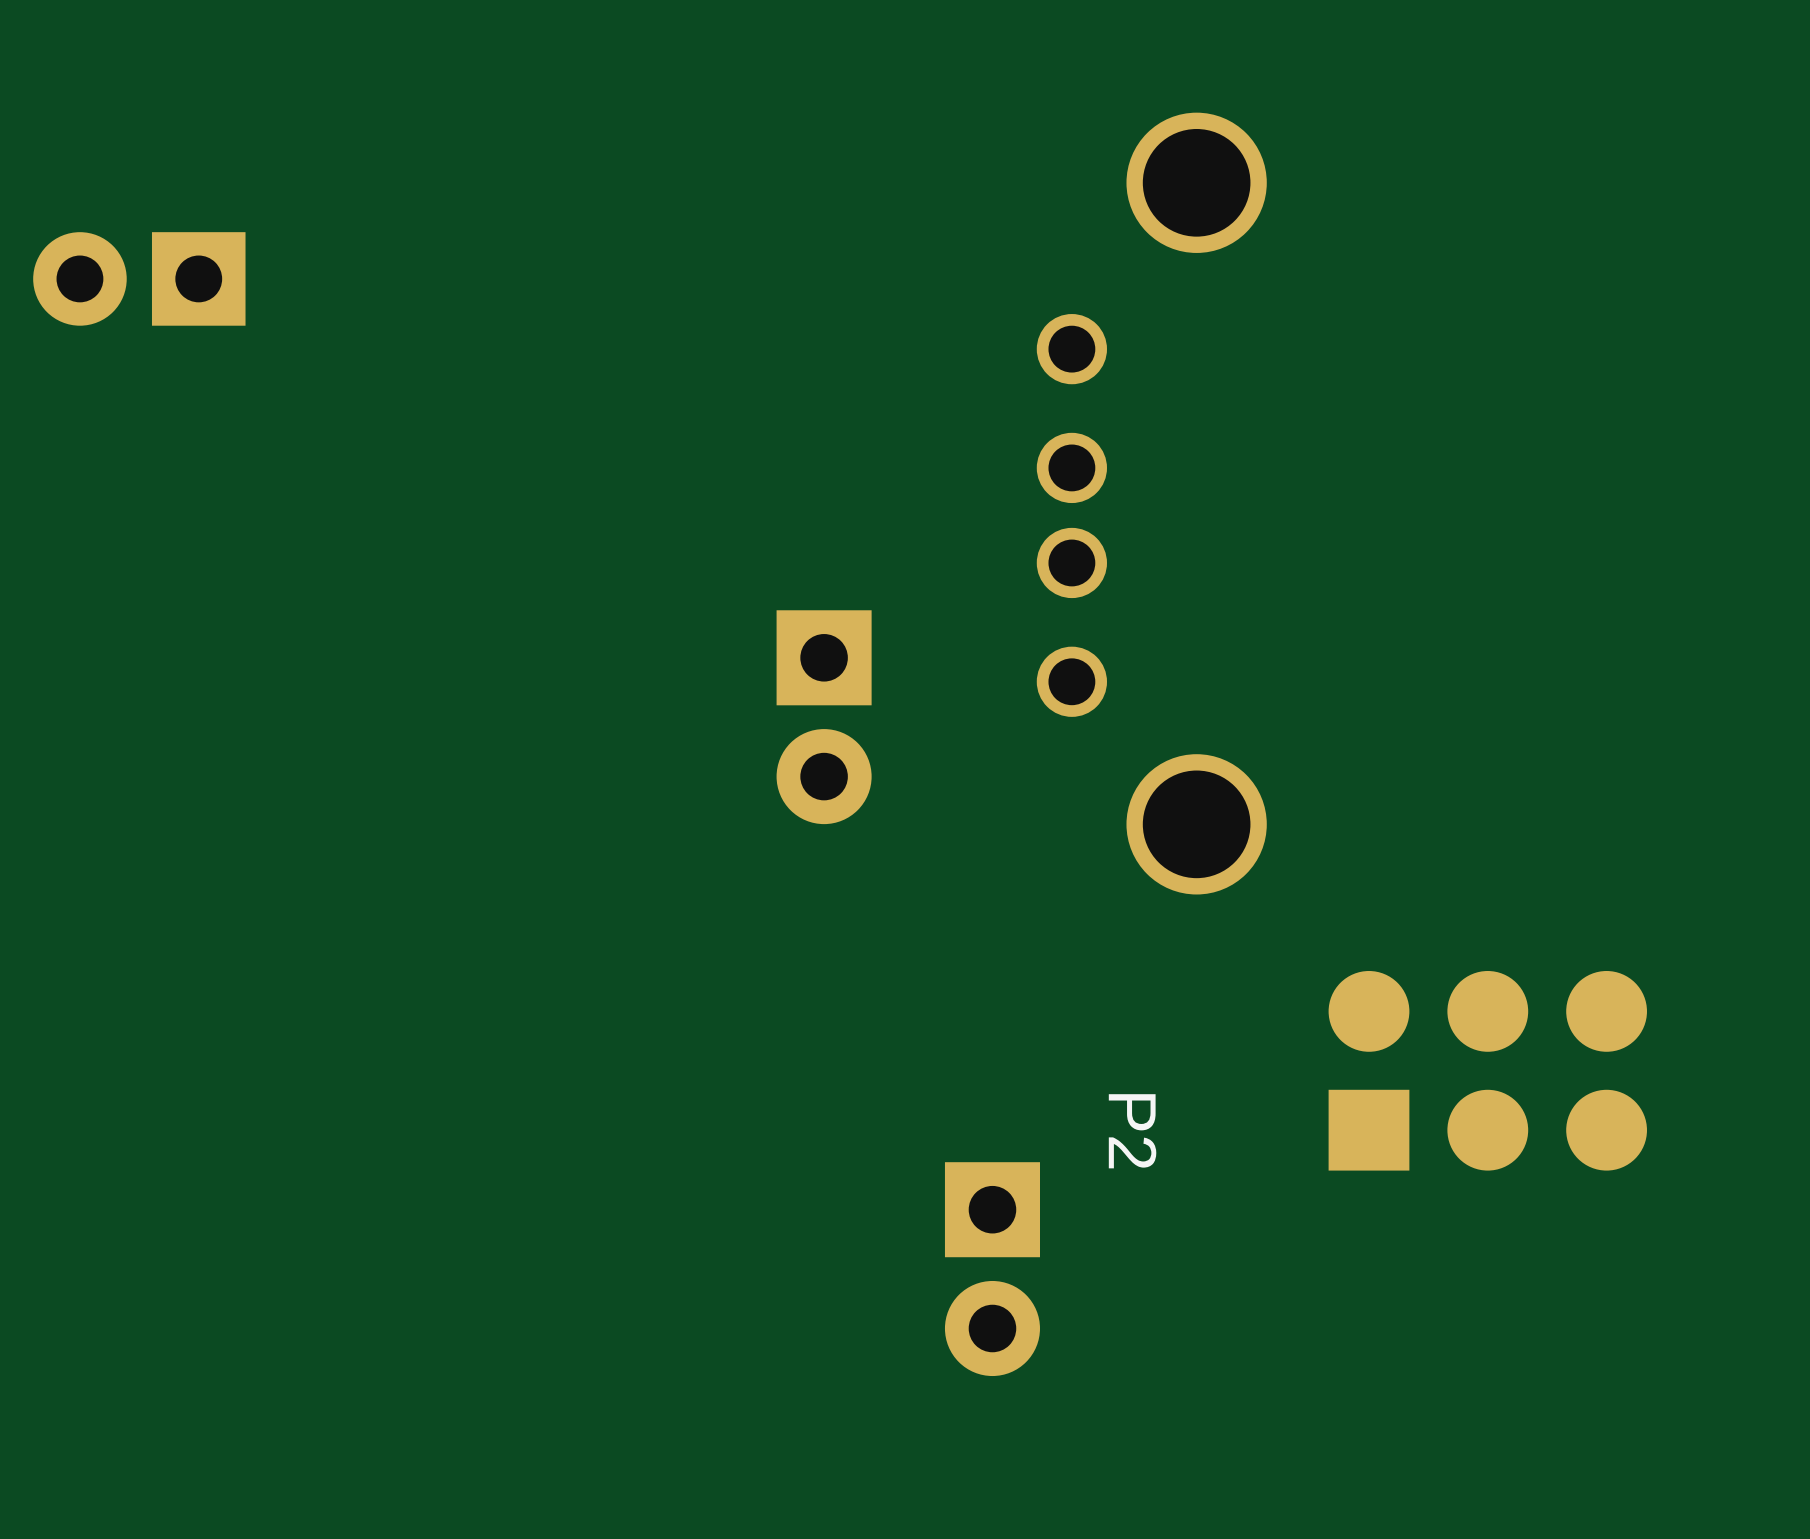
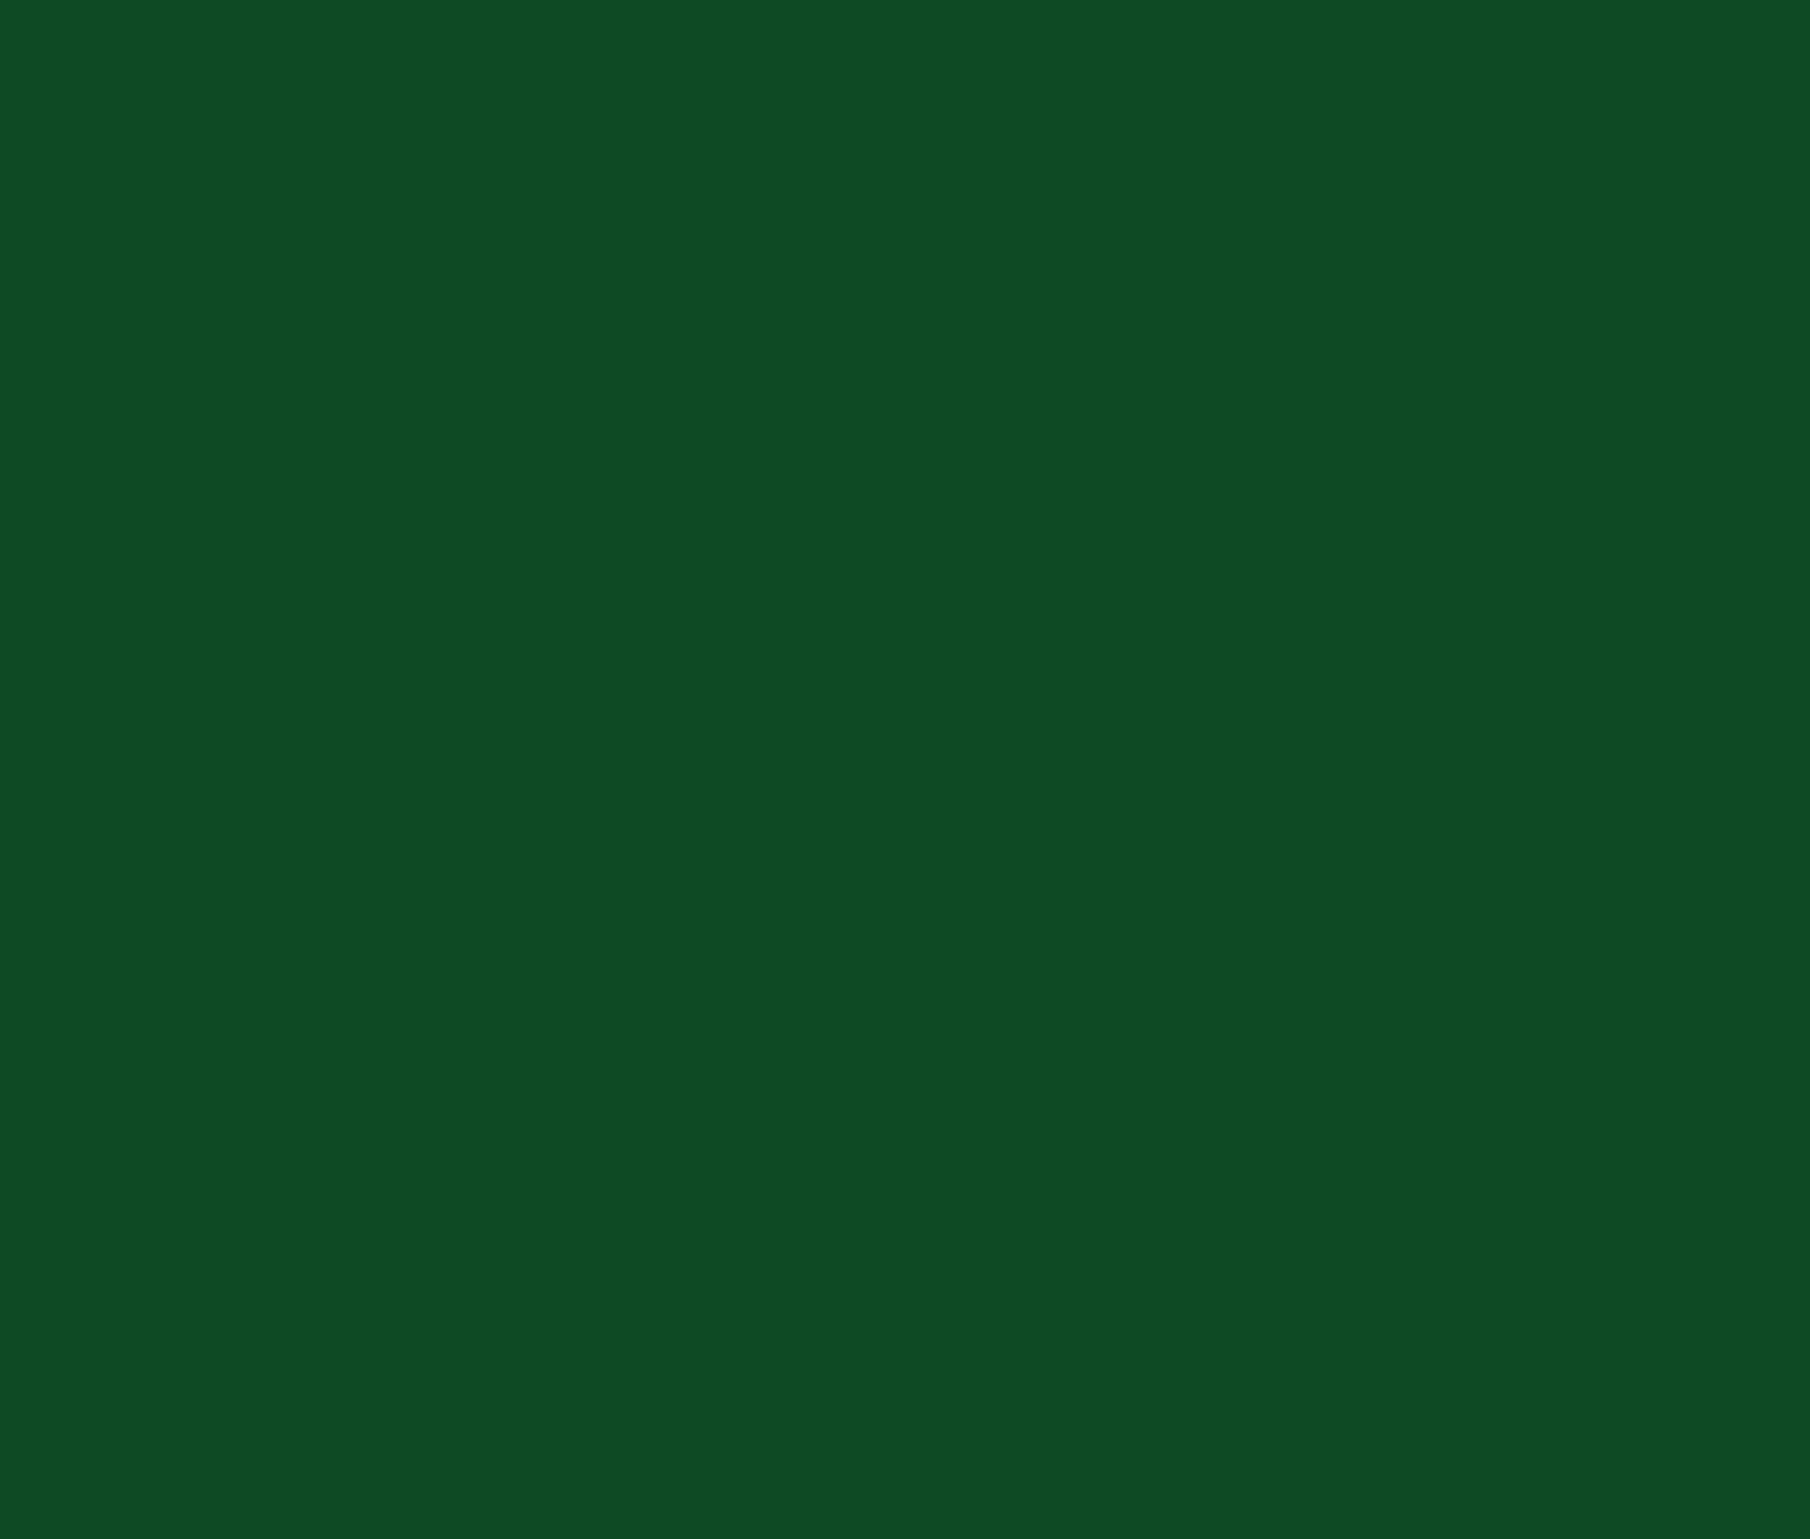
part: (139, 278) -> none
part: (1151, 503) -> none
part: (824, 717) -> none
P2: (1487, 1070) -> none
part: (992, 1269) -> none

